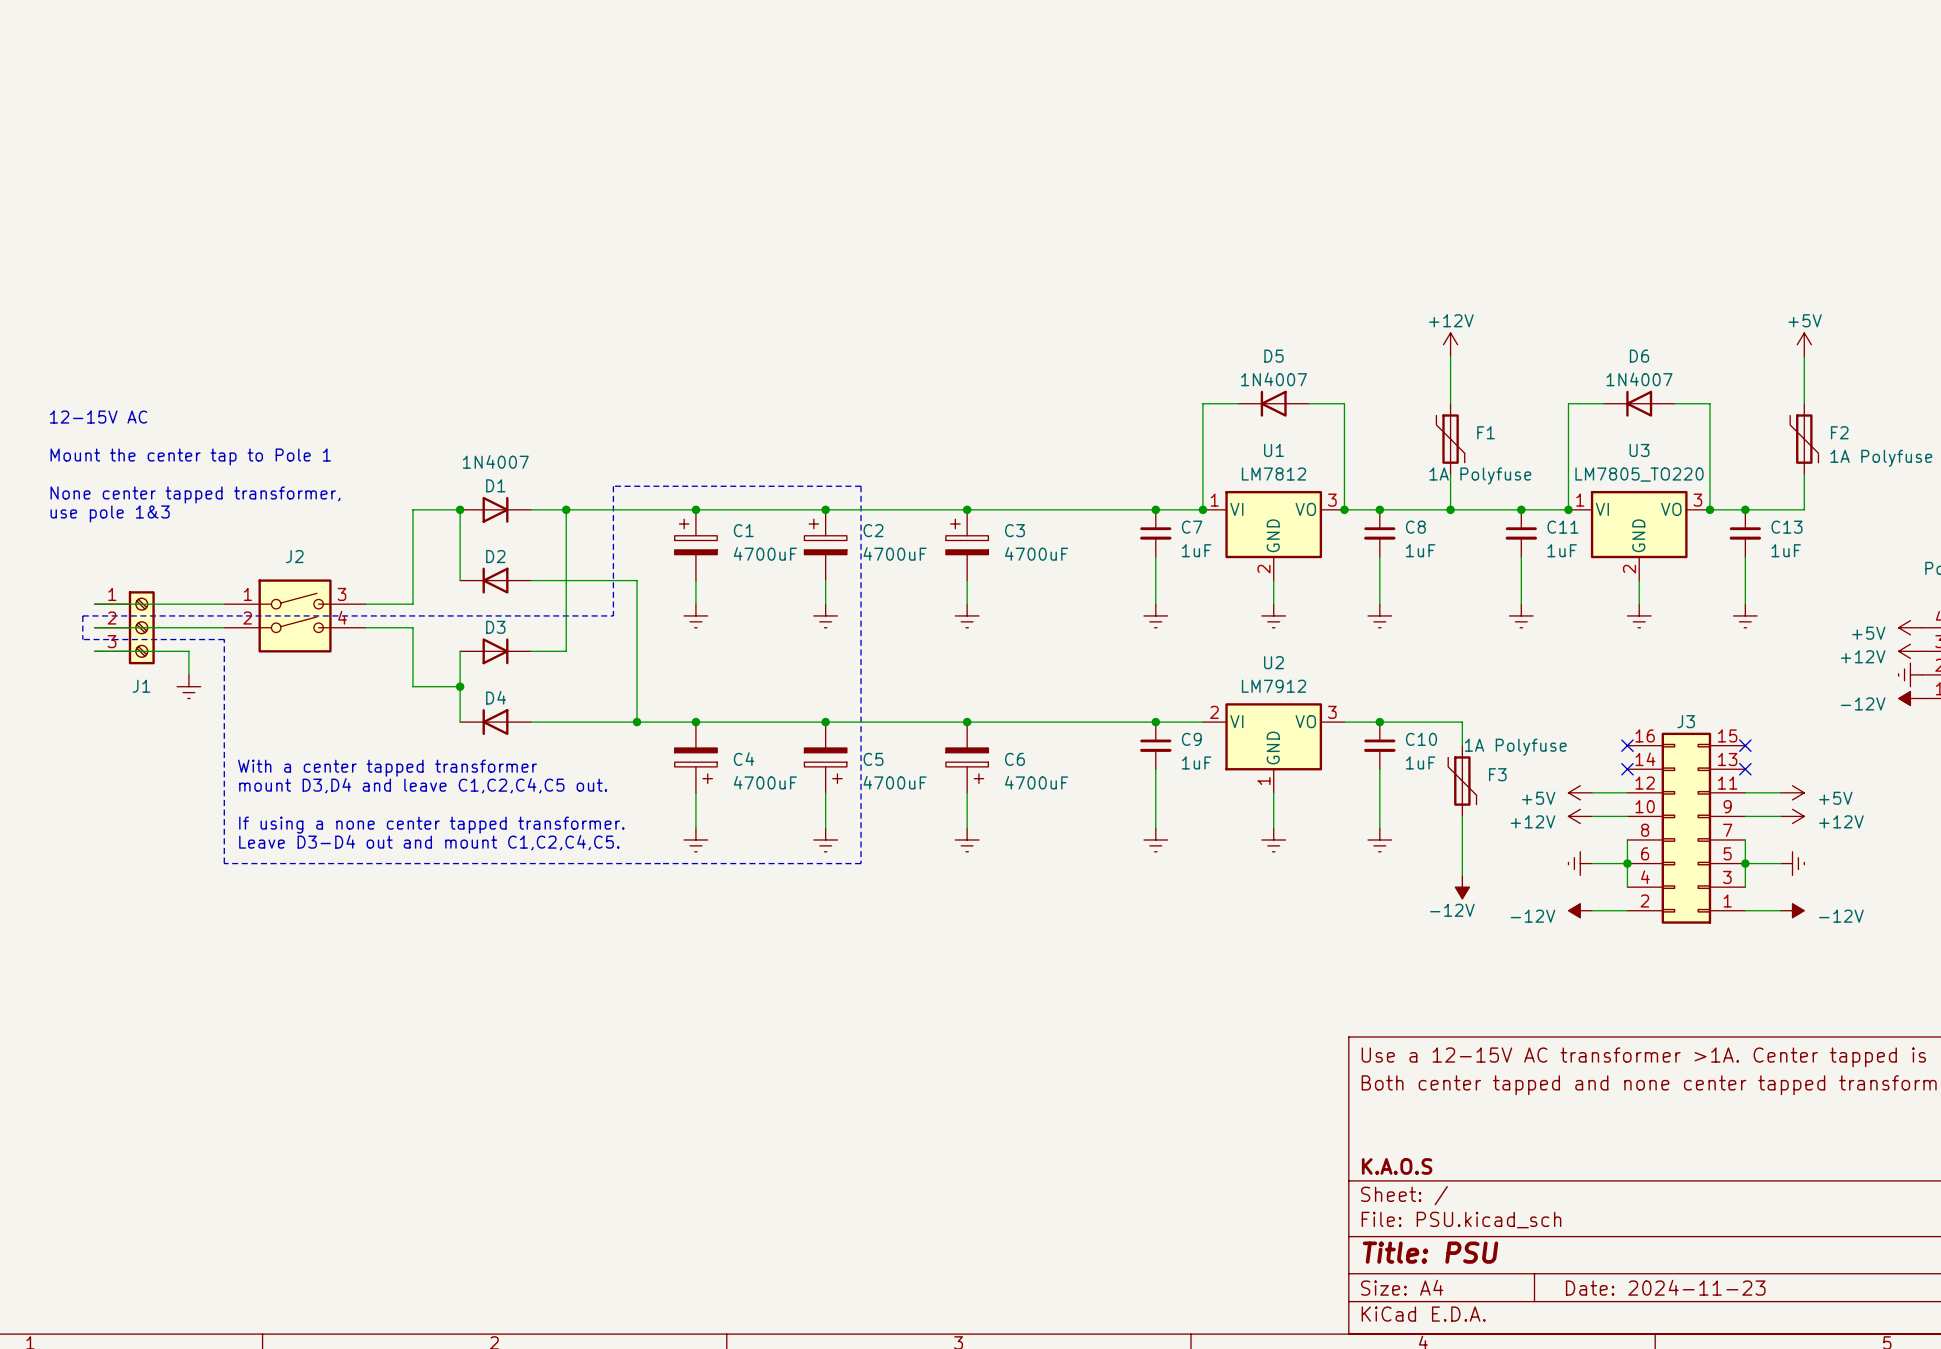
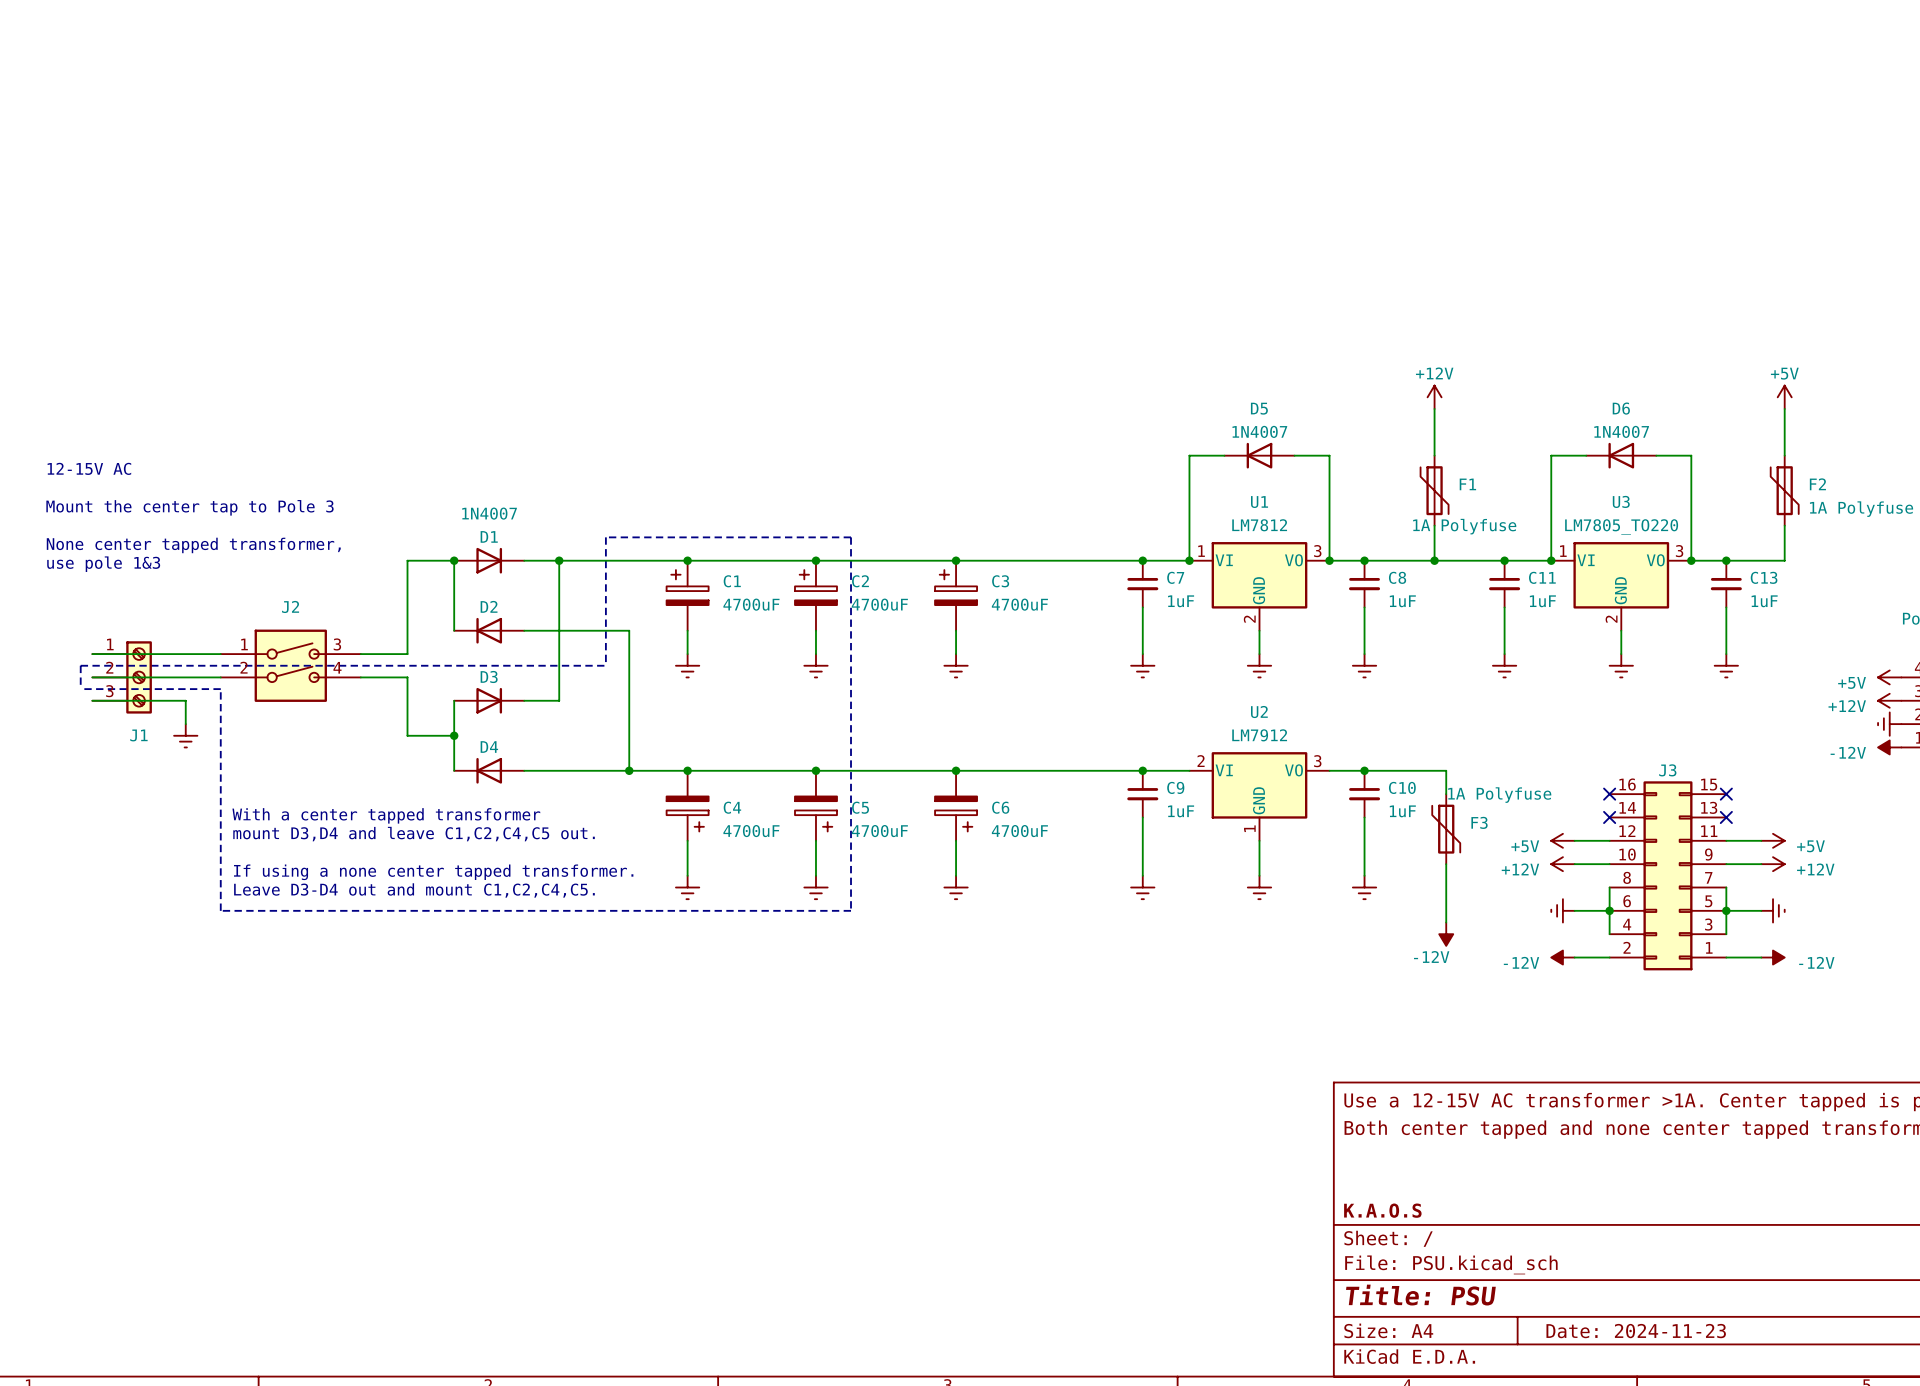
text: Mount the center tap to Pole 1 (190, 456) -> Mount the center tap to Pole 3 (190, 507)

